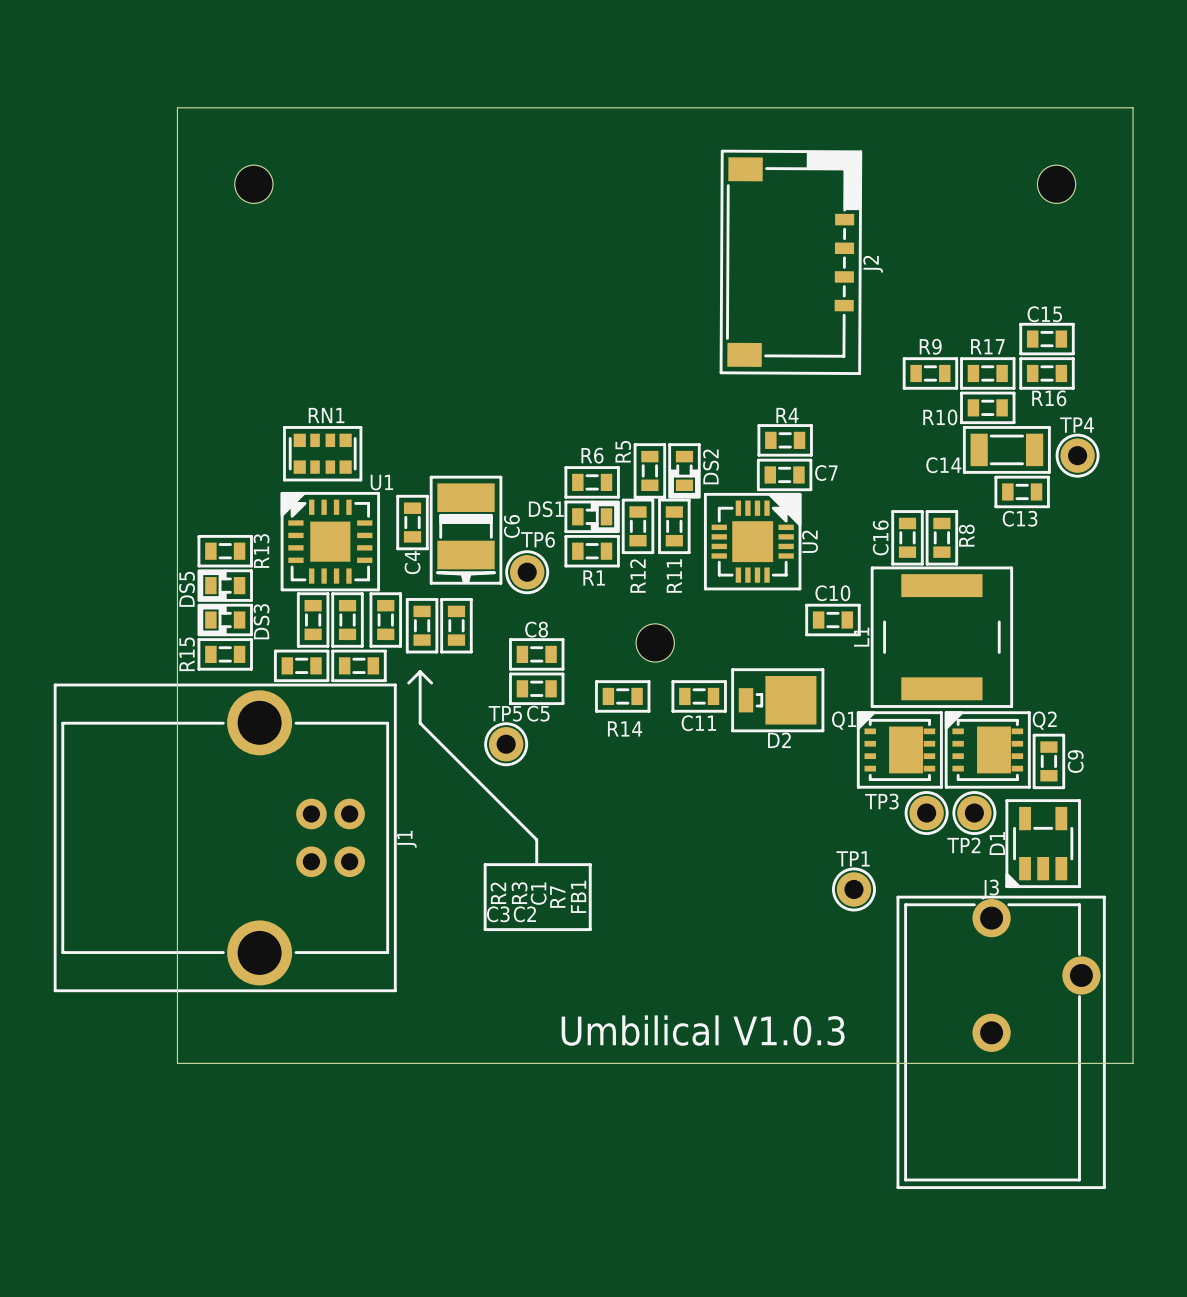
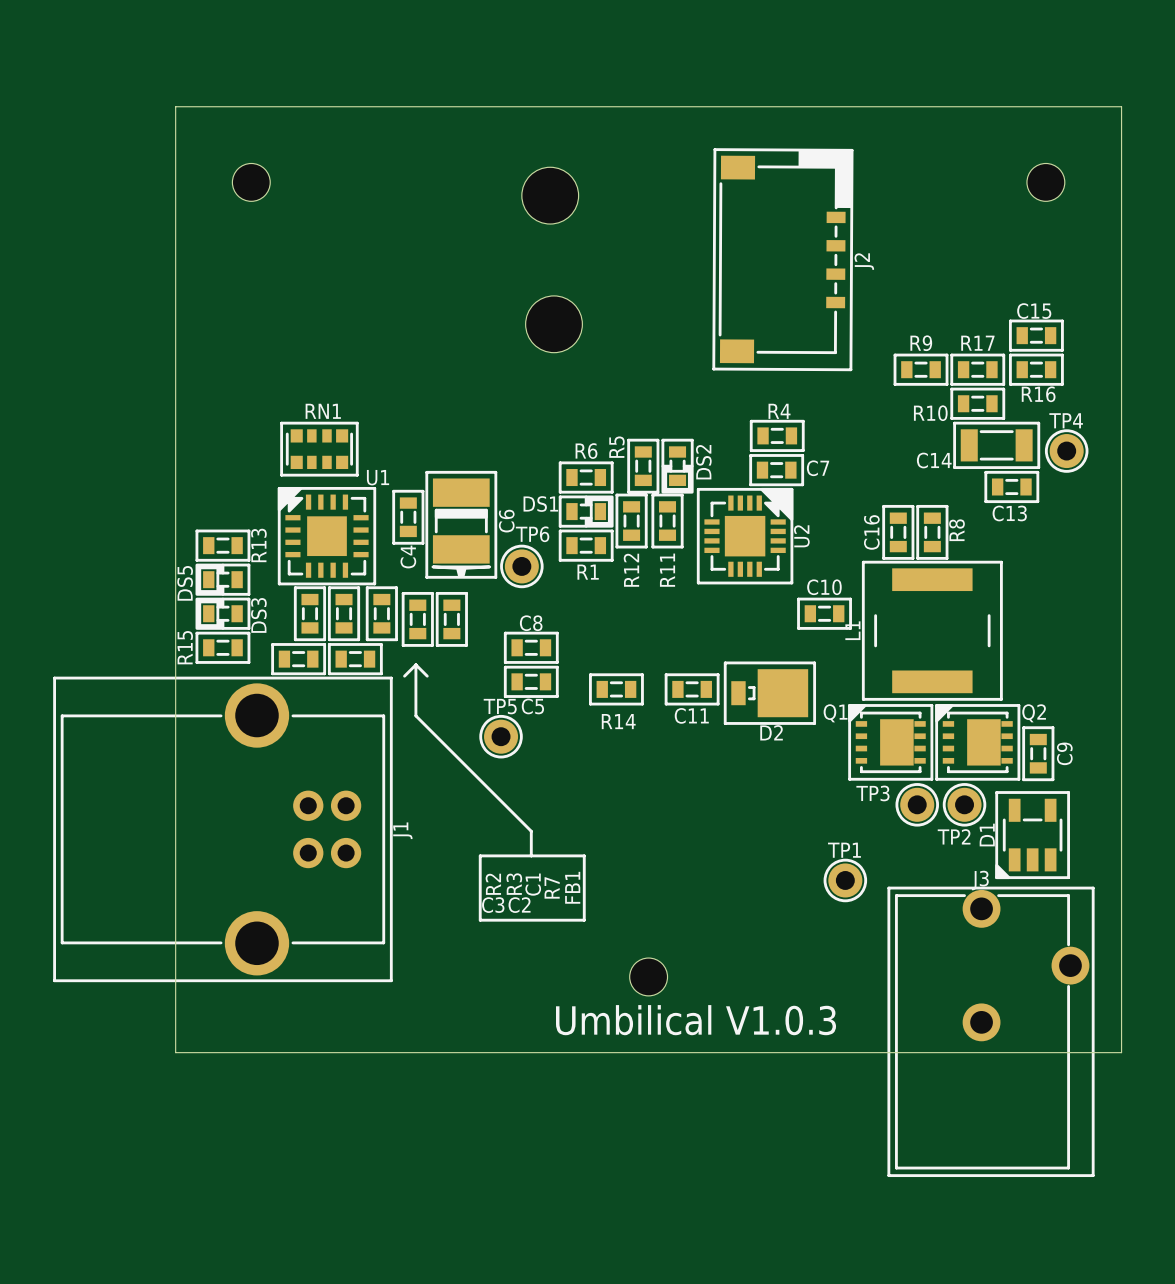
hole: none -> (550, 195)
hole: none -> (554, 324)
hole position: (655, 642) -> (648, 976)

